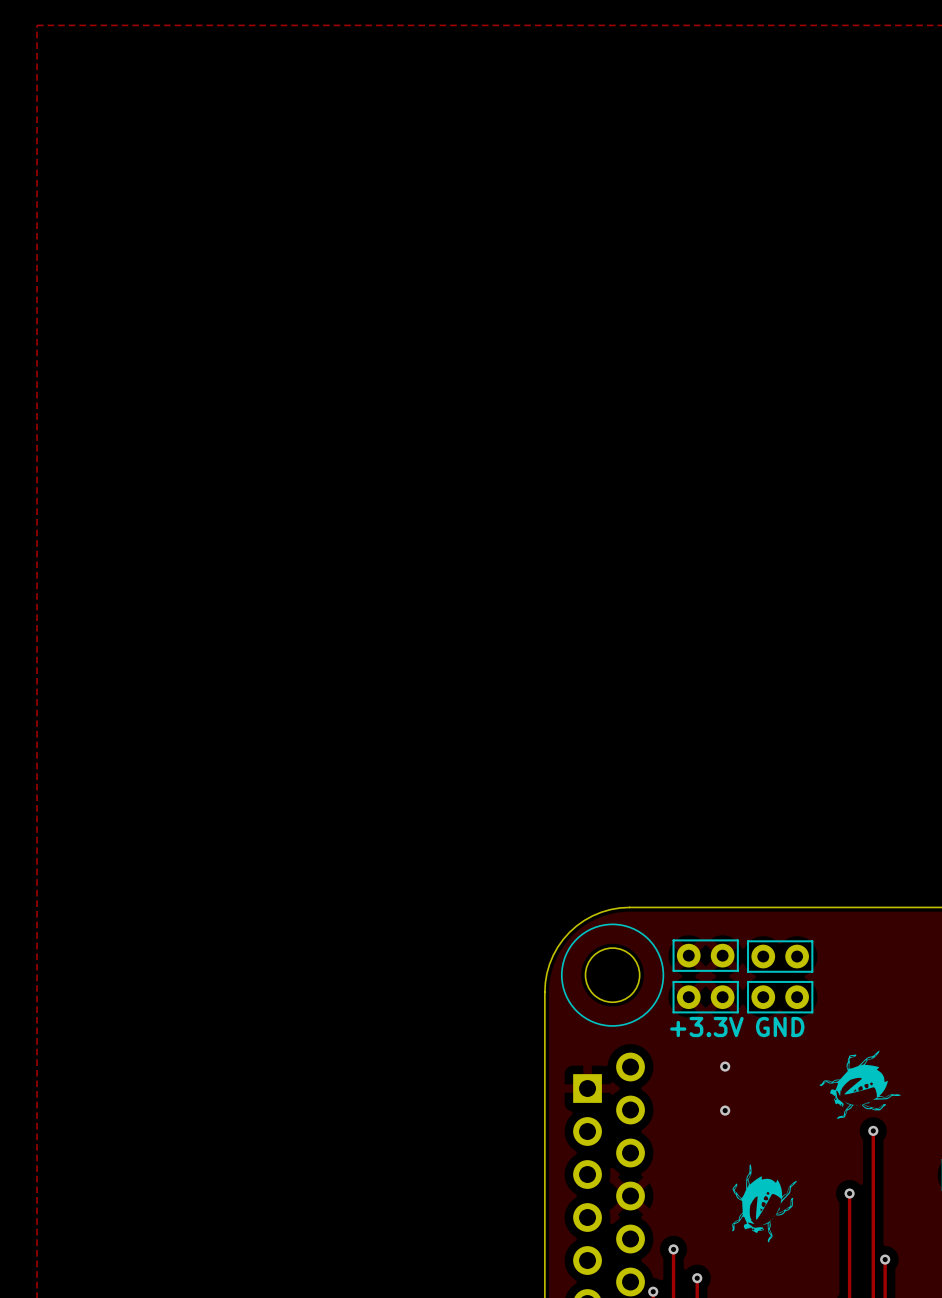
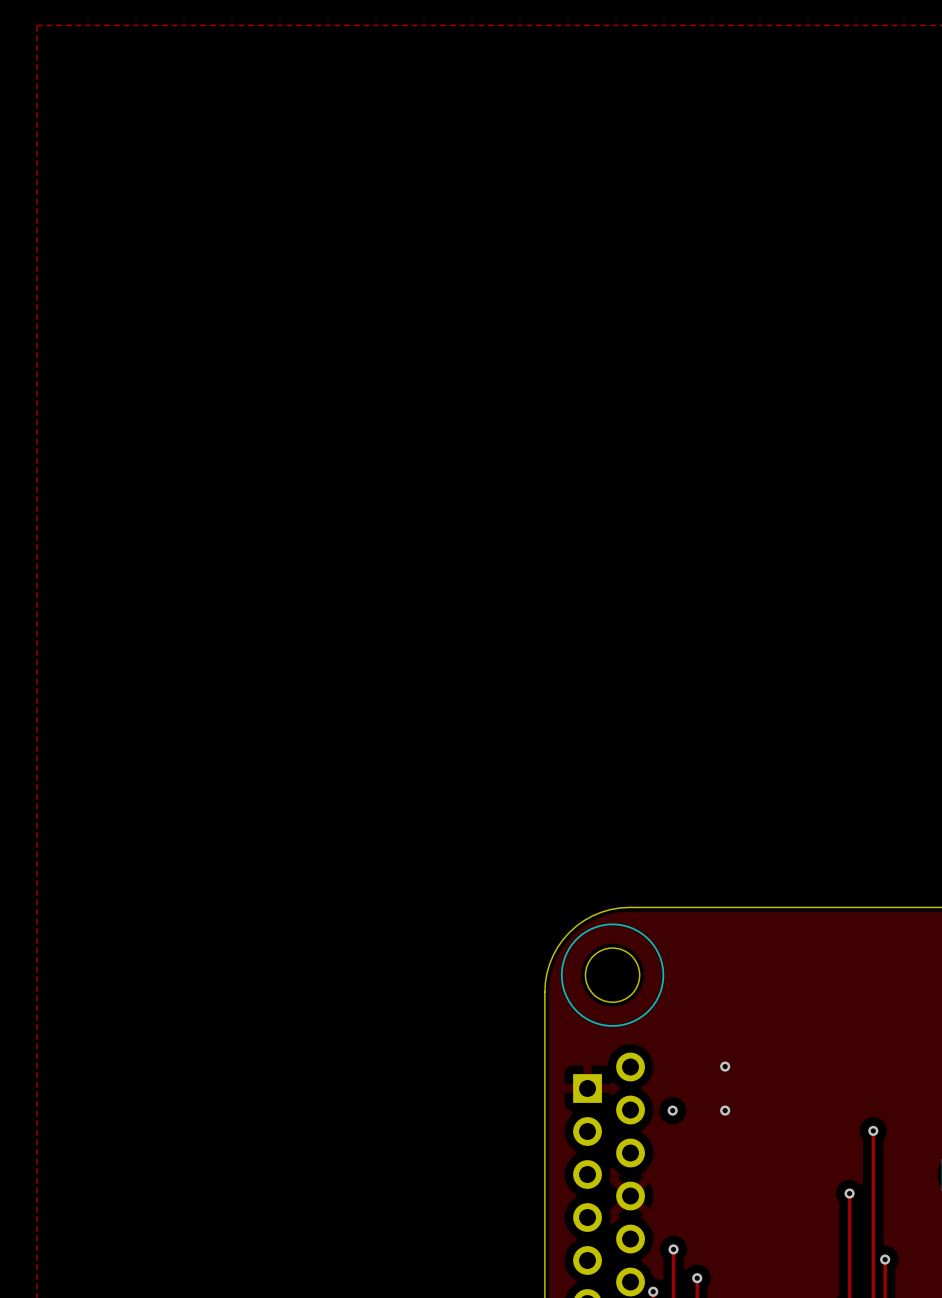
part: (705, 955) -> none
part: (780, 956) -> none
part: (705, 997) -> none
part: (780, 997) -> none
text: +3.3V (706, 1027) -> none
text: GND (780, 1027) -> none
drawing: [819, 1050, 901, 1120] -> none
via: none -> (672, 1110)
drawing: [732, 1164, 797, 1243] -> none

